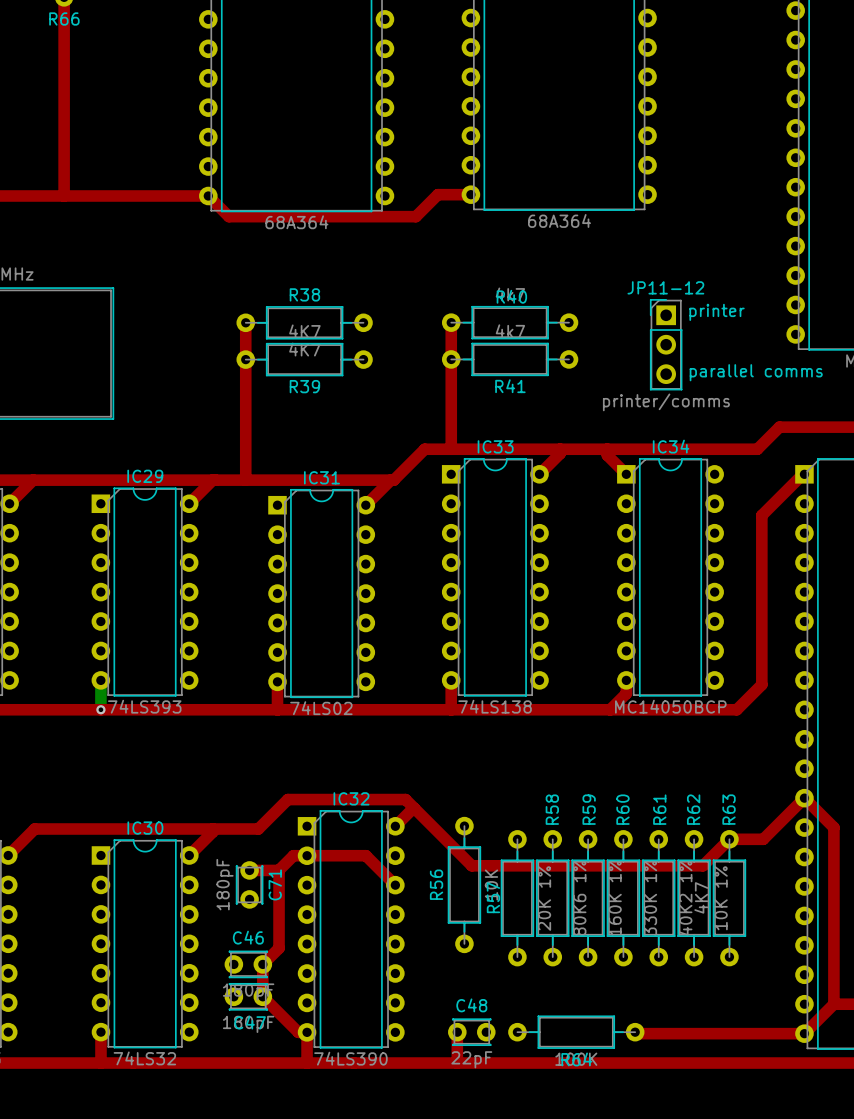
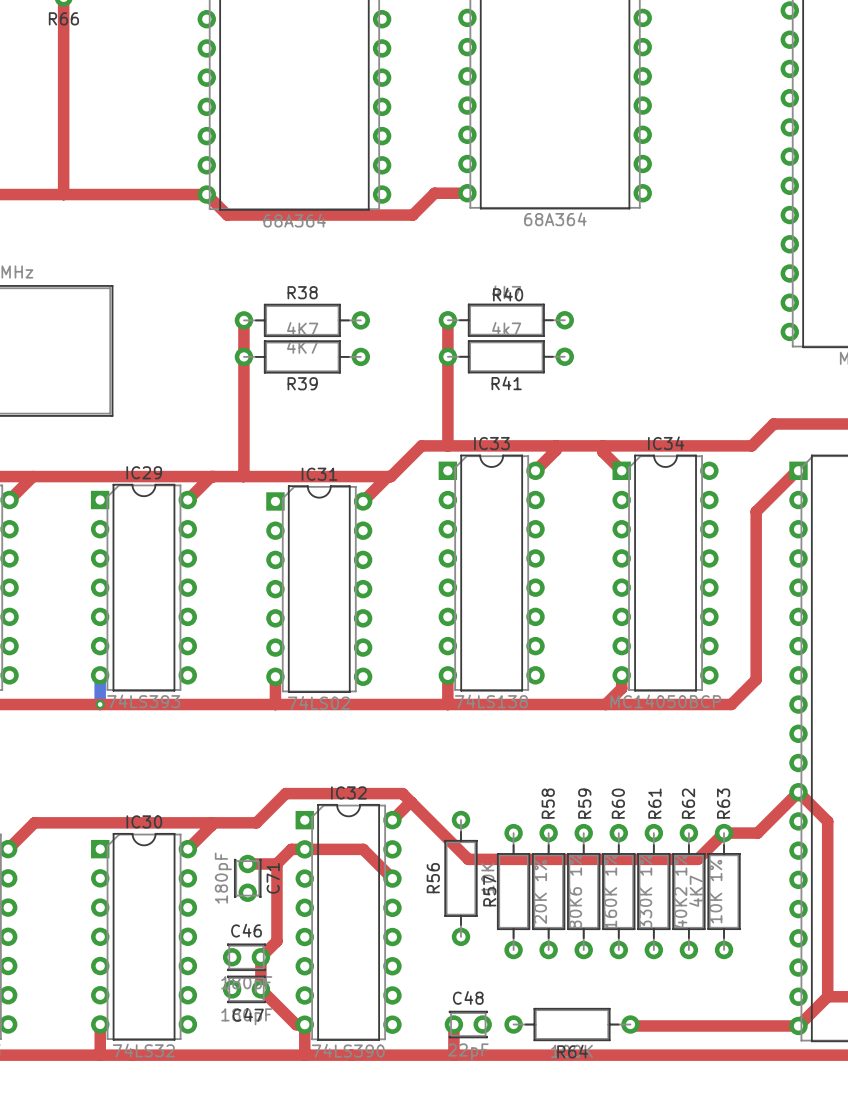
text: printer (717, 312) -> none
JP11-12: printer/comms (666, 344) -> none
text: parallel comms (756, 372) -> none

